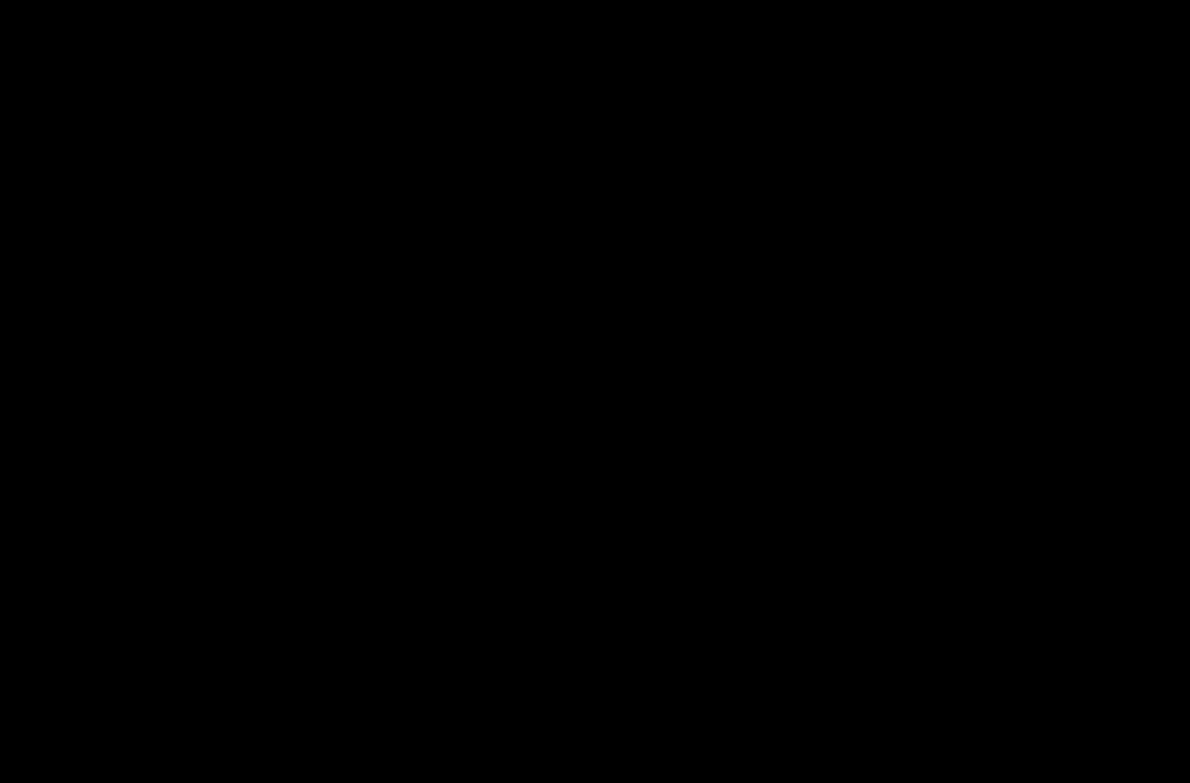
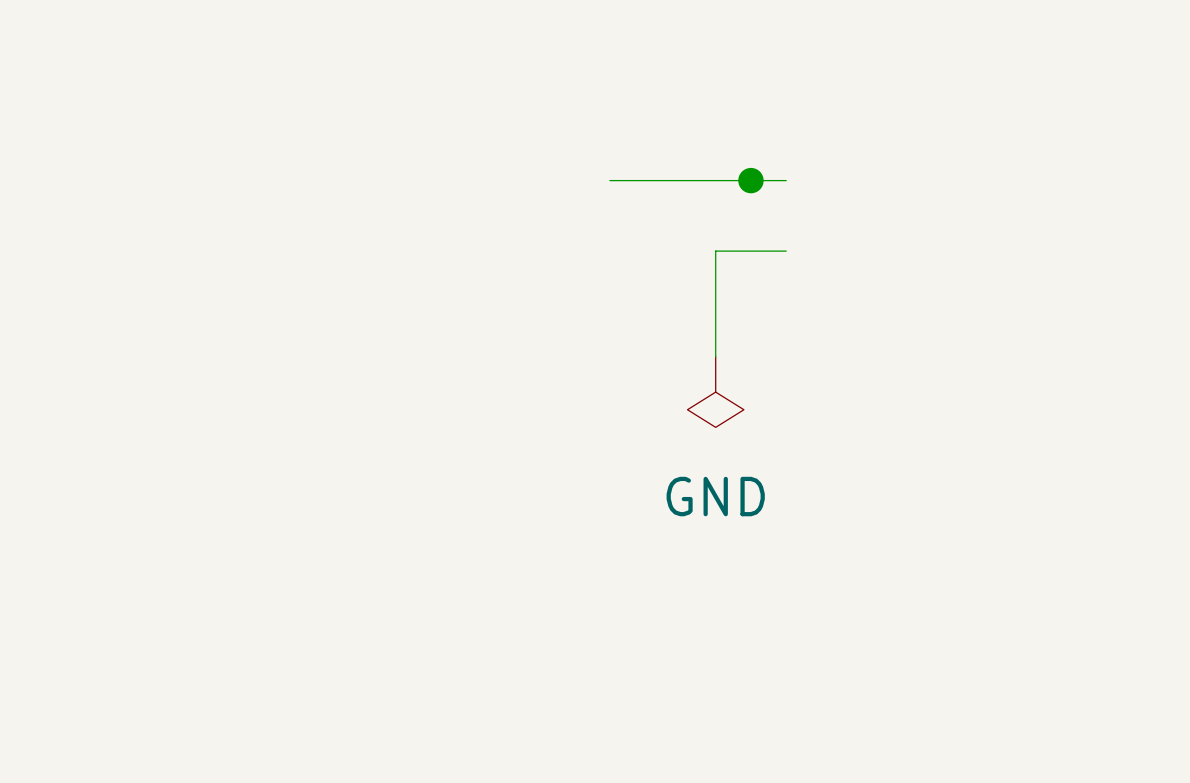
wire: none -> (609, 180) (786, 180)
junction: none -> (750, 180)
wire: none -> (786, 251) (715, 251) (715, 356)
power symbol: none -> GND (715, 392)

